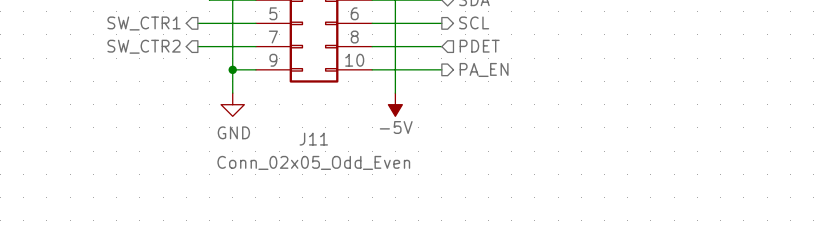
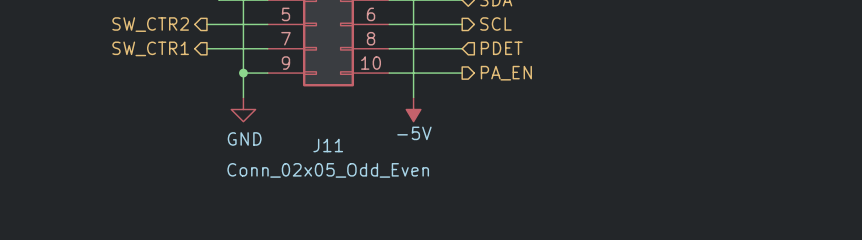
hierarchical label: SW_CTR1 (144, 23) -> SW_CTR2 (150, 24)
hierarchical label: SW_CTR2 (144, 46) -> SW_CTR1 (150, 48)

